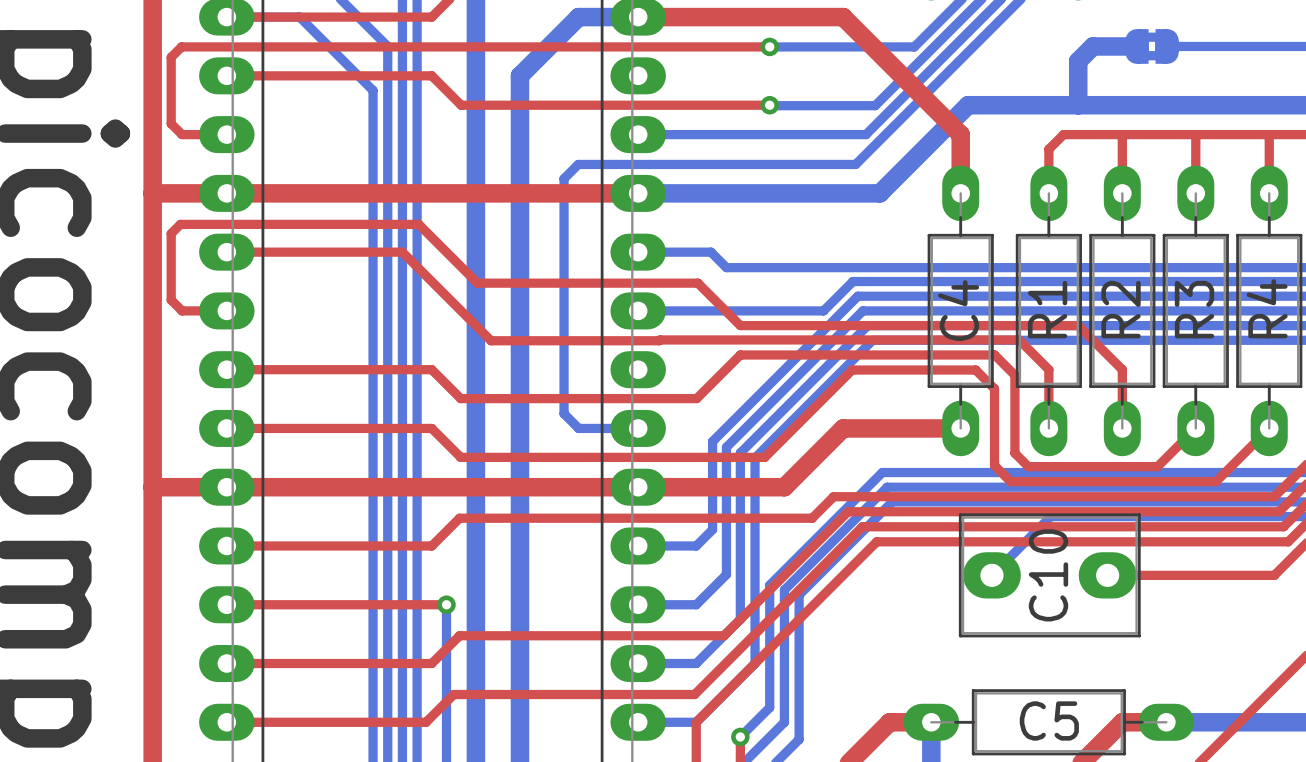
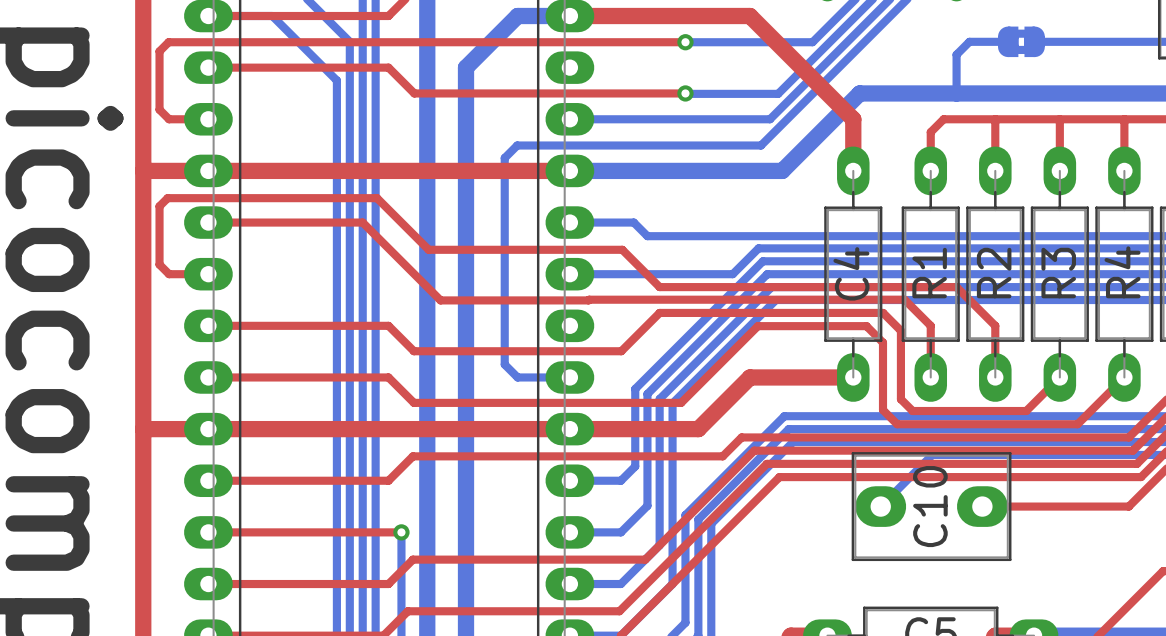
bottom track width: thick (1133, 46) (1092, 46) (1078, 61) (1078, 105) -> thin (1005, 41) (969, 41) (956, 54) (956, 93)

